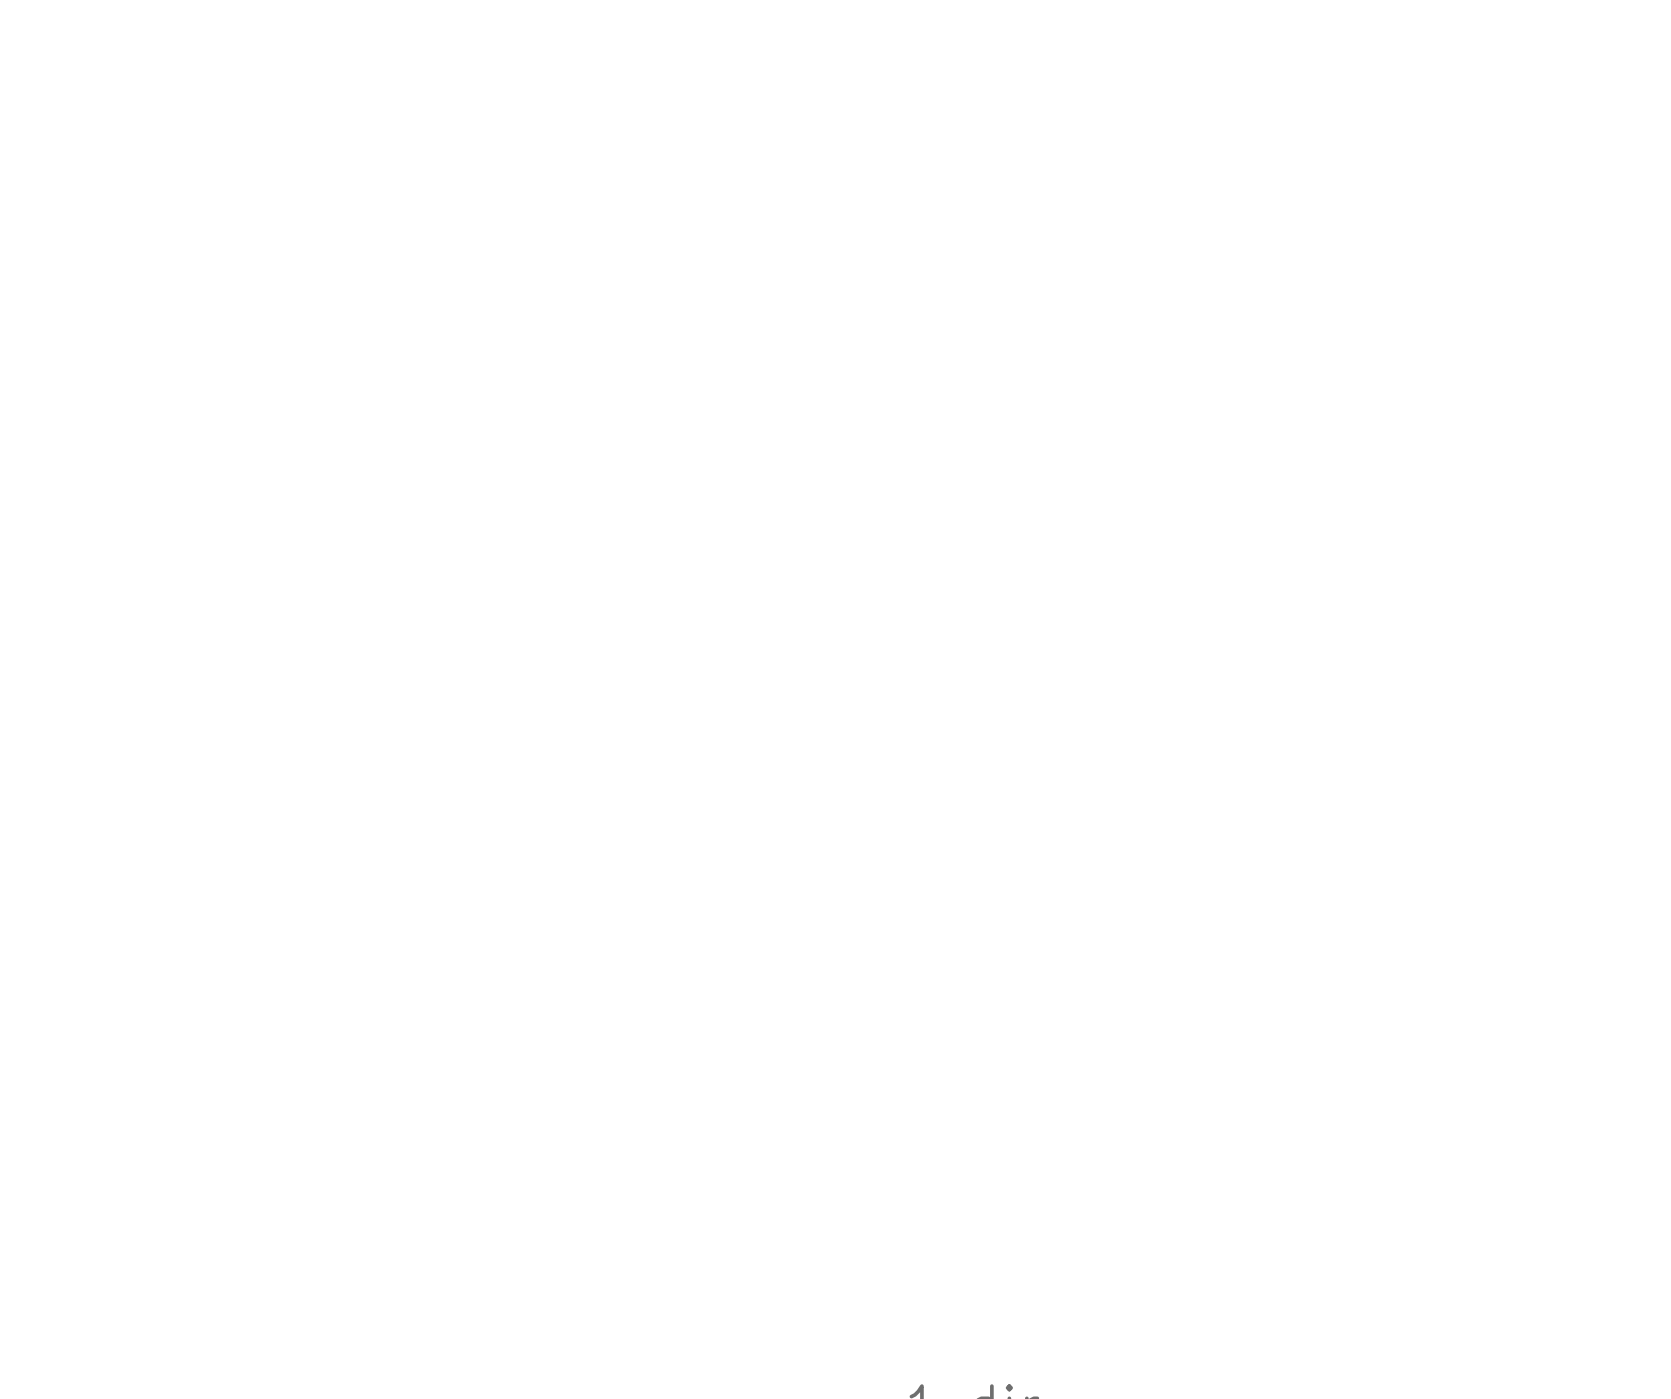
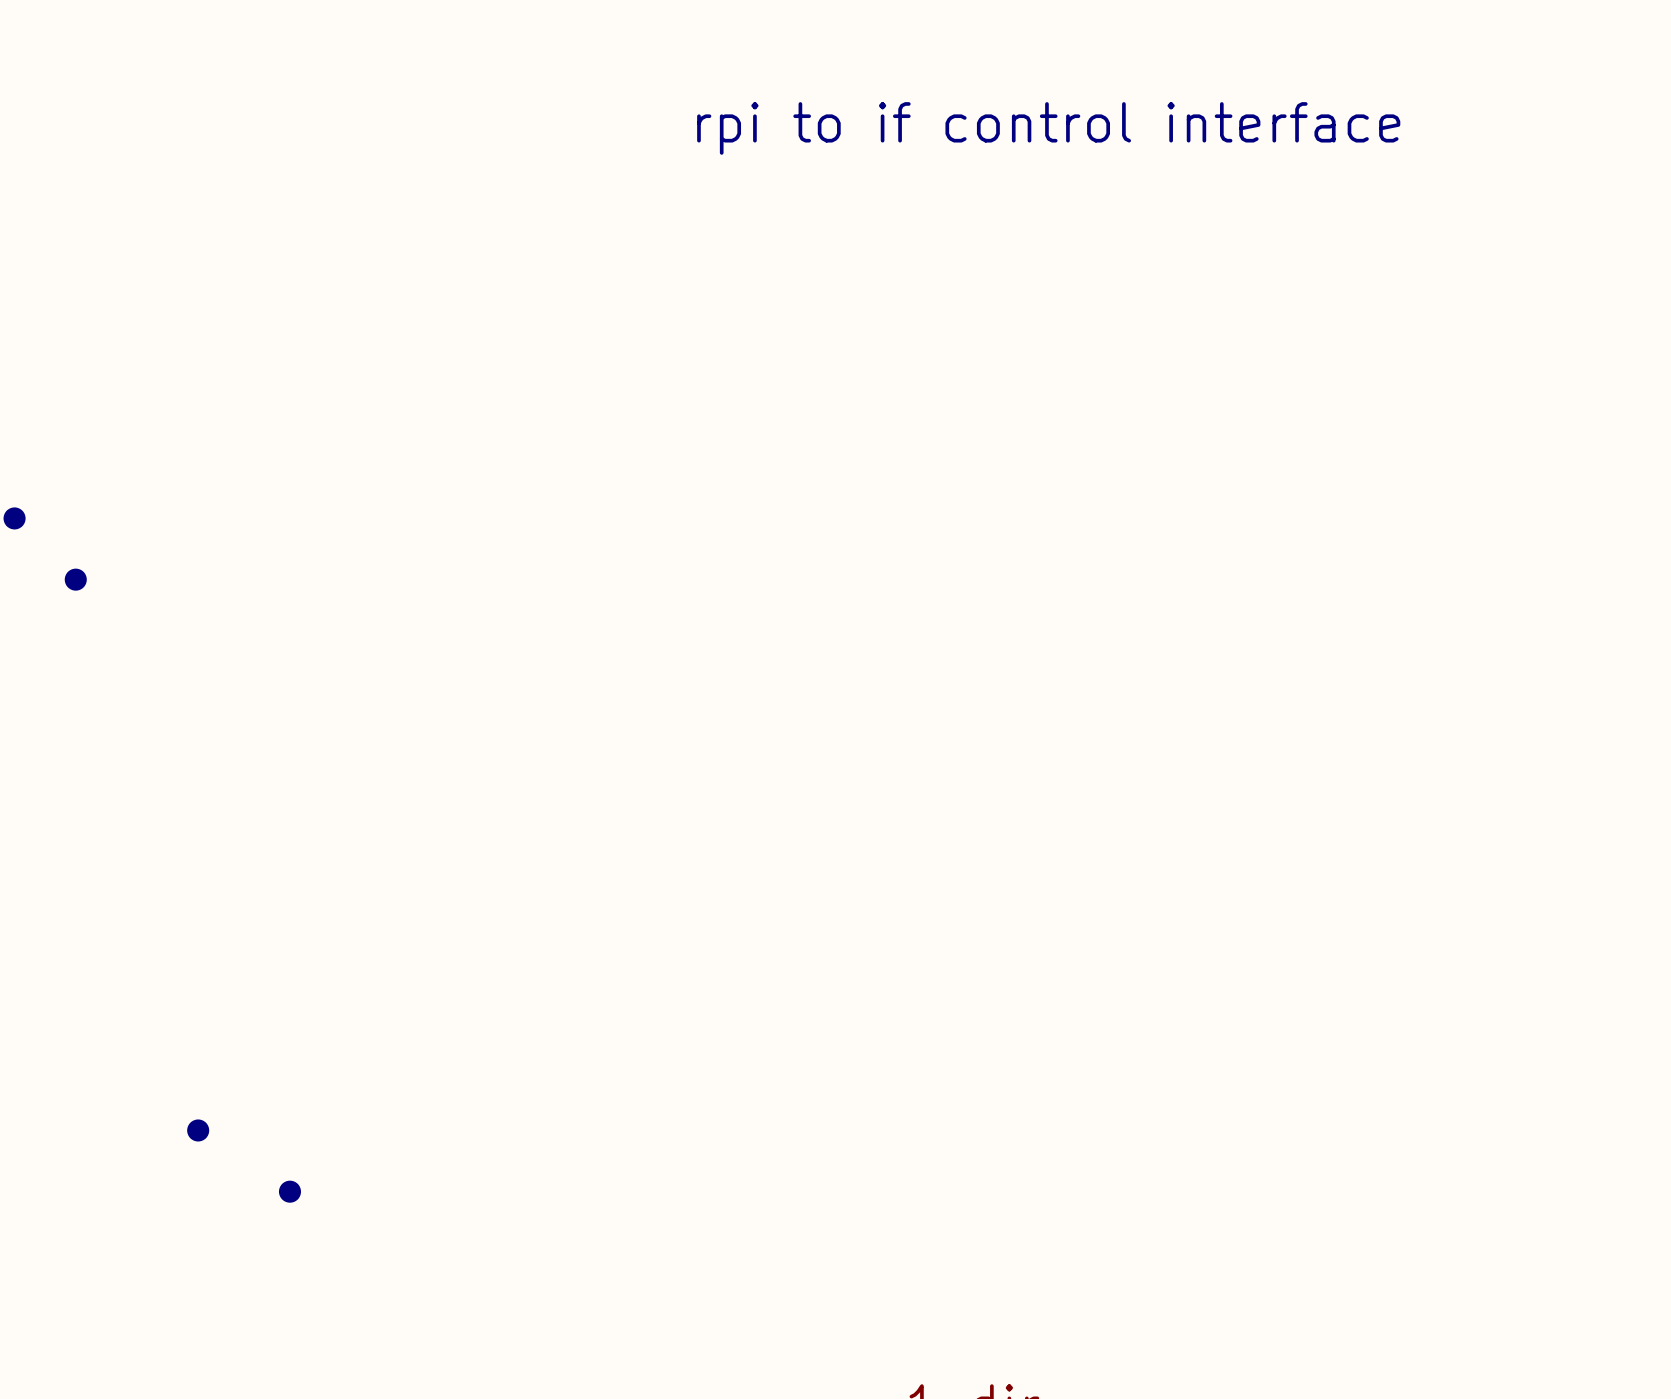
text: none -> rpi to if control interface (1048, 128)
junction: none -> (14, 518)
junction: none -> (75, 579)
junction: none -> (198, 1130)
junction: none -> (289, 1191)

